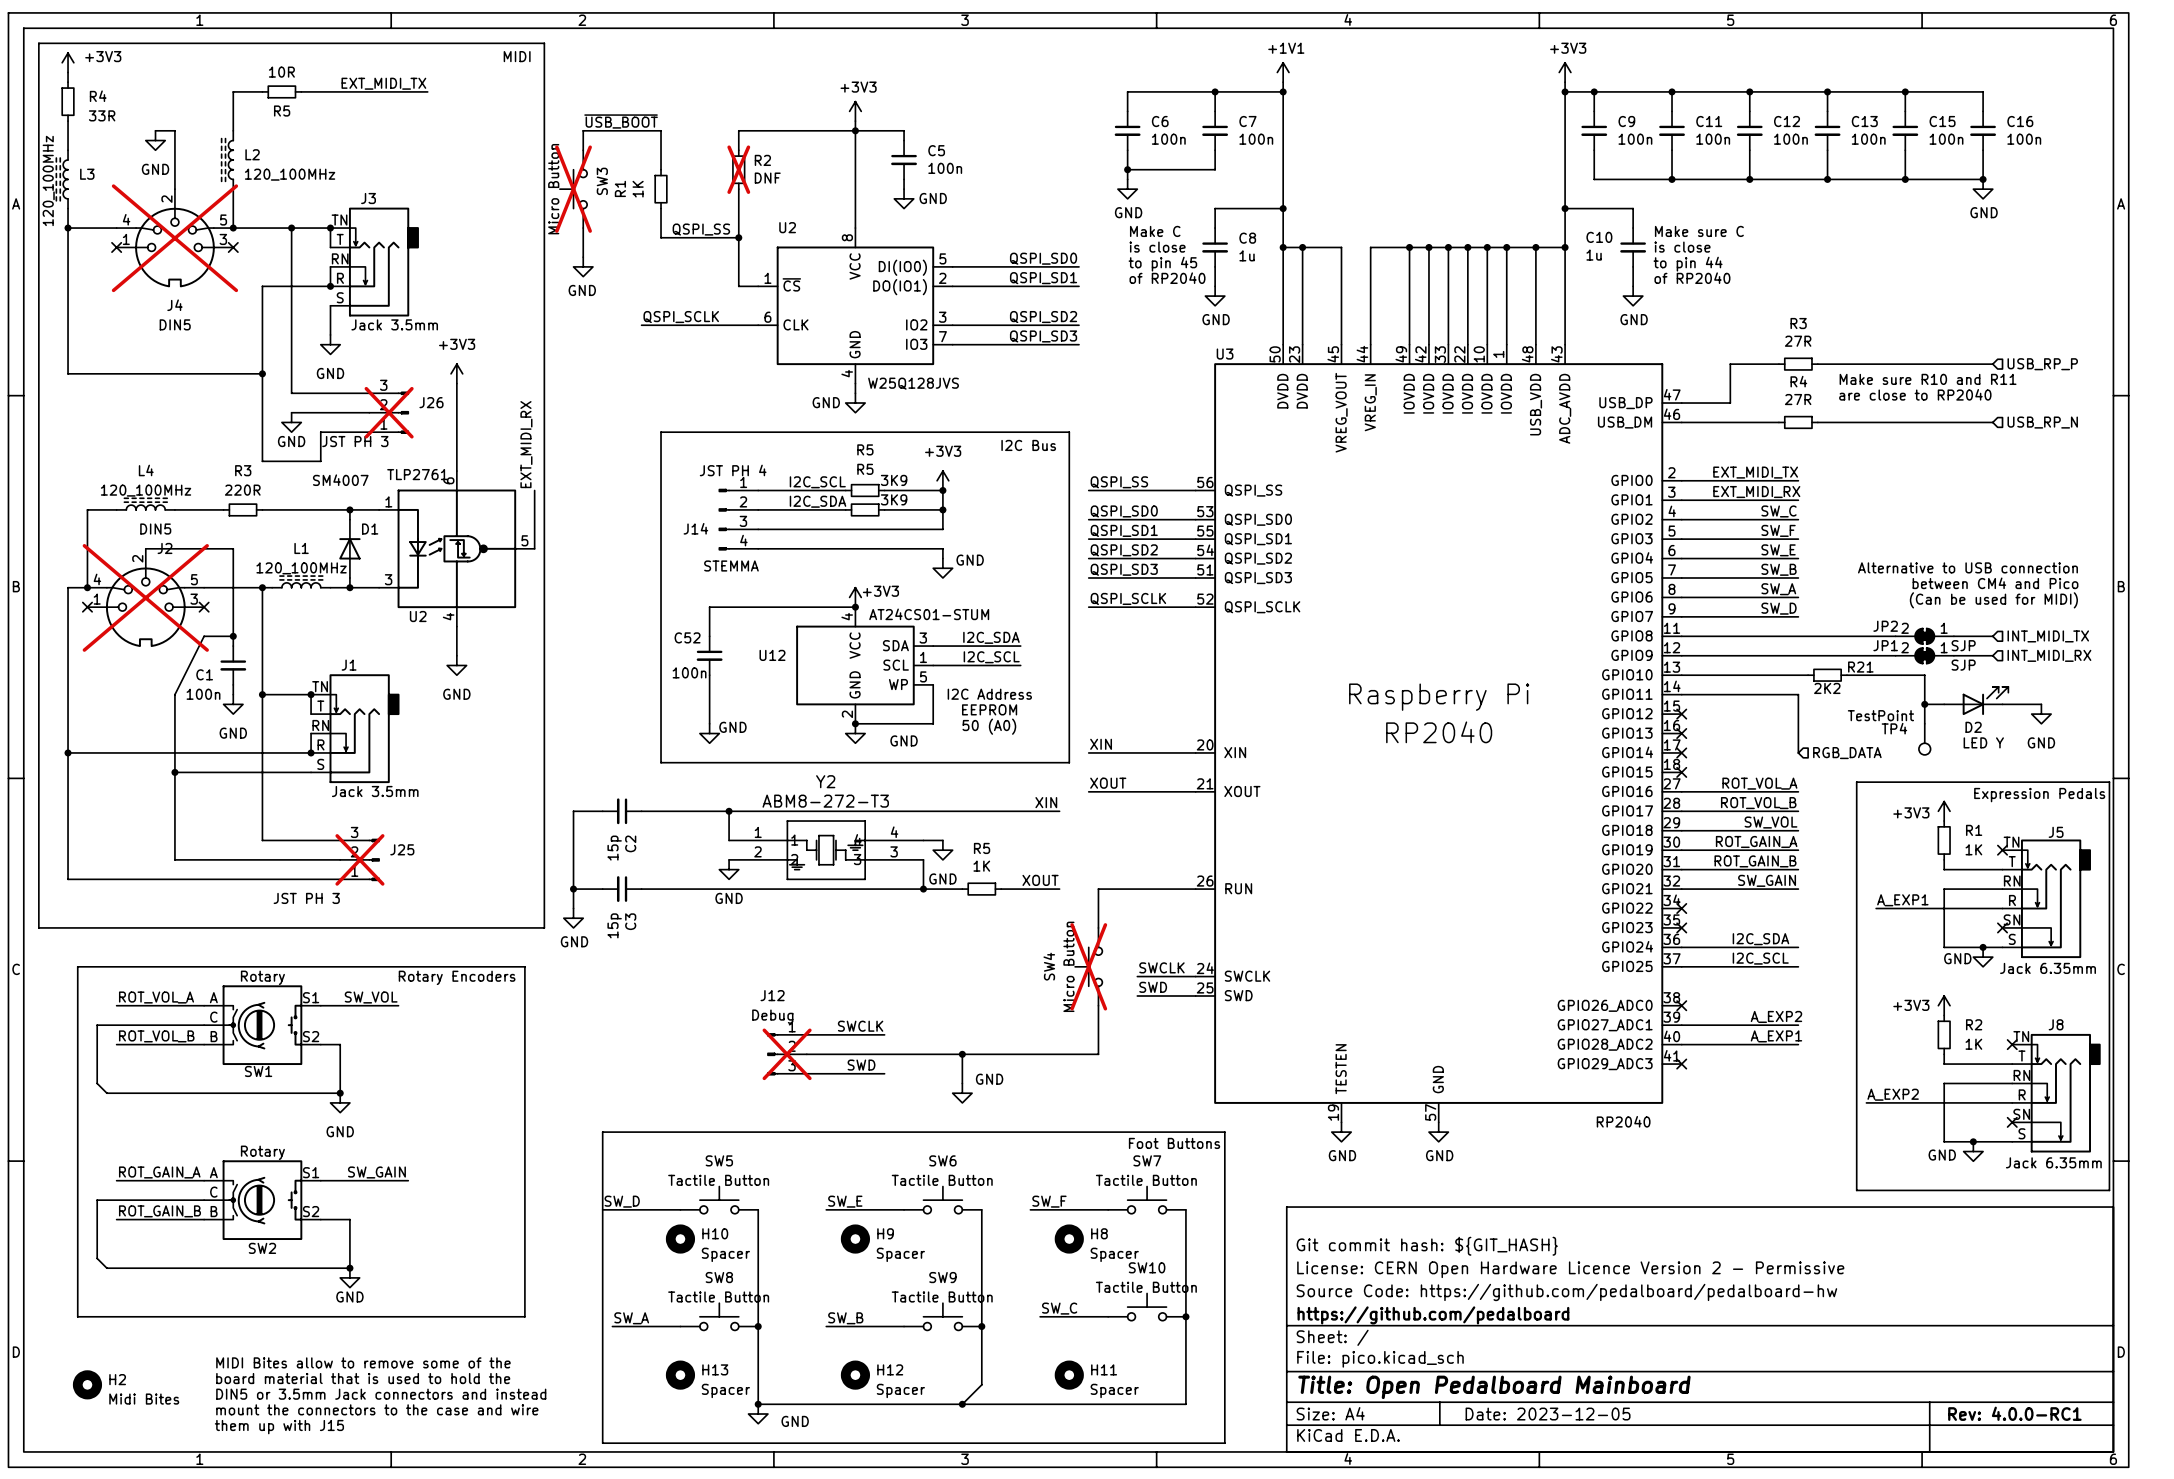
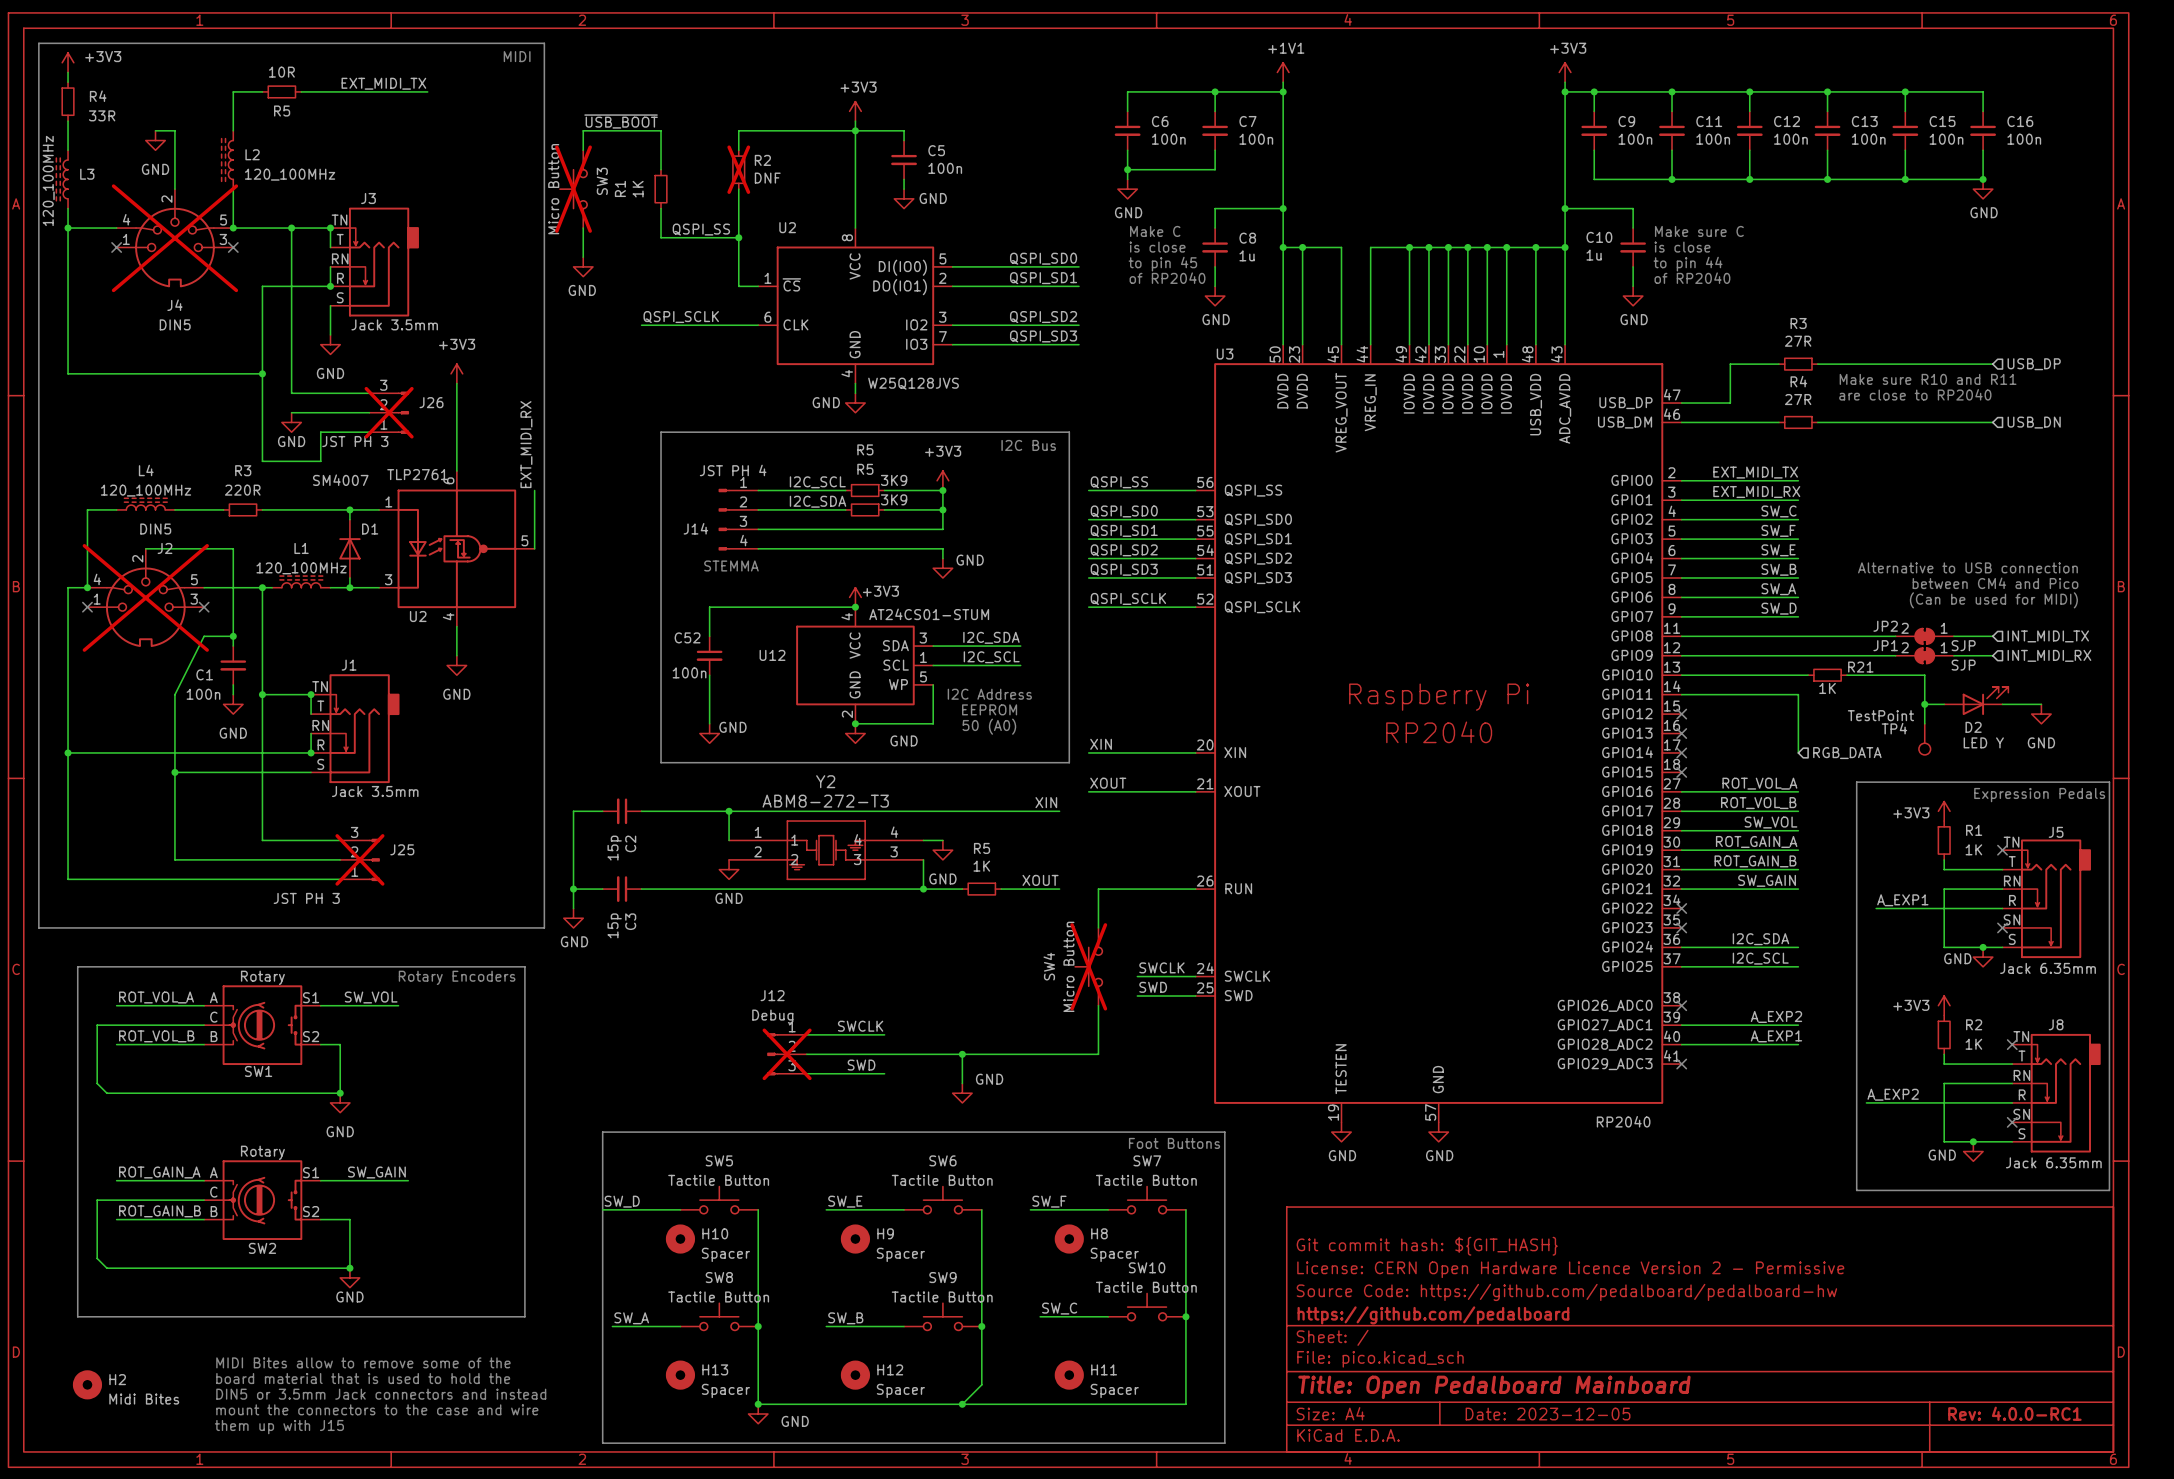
hierarchical label: USB_RP_P (2042, 364) -> USB_DP (2034, 364)
hierarchical label: USB_RP_N (2042, 422) -> USB_DN (2034, 422)
R21 value: 2K2 (1827, 688) -> 1K (1827, 688)

